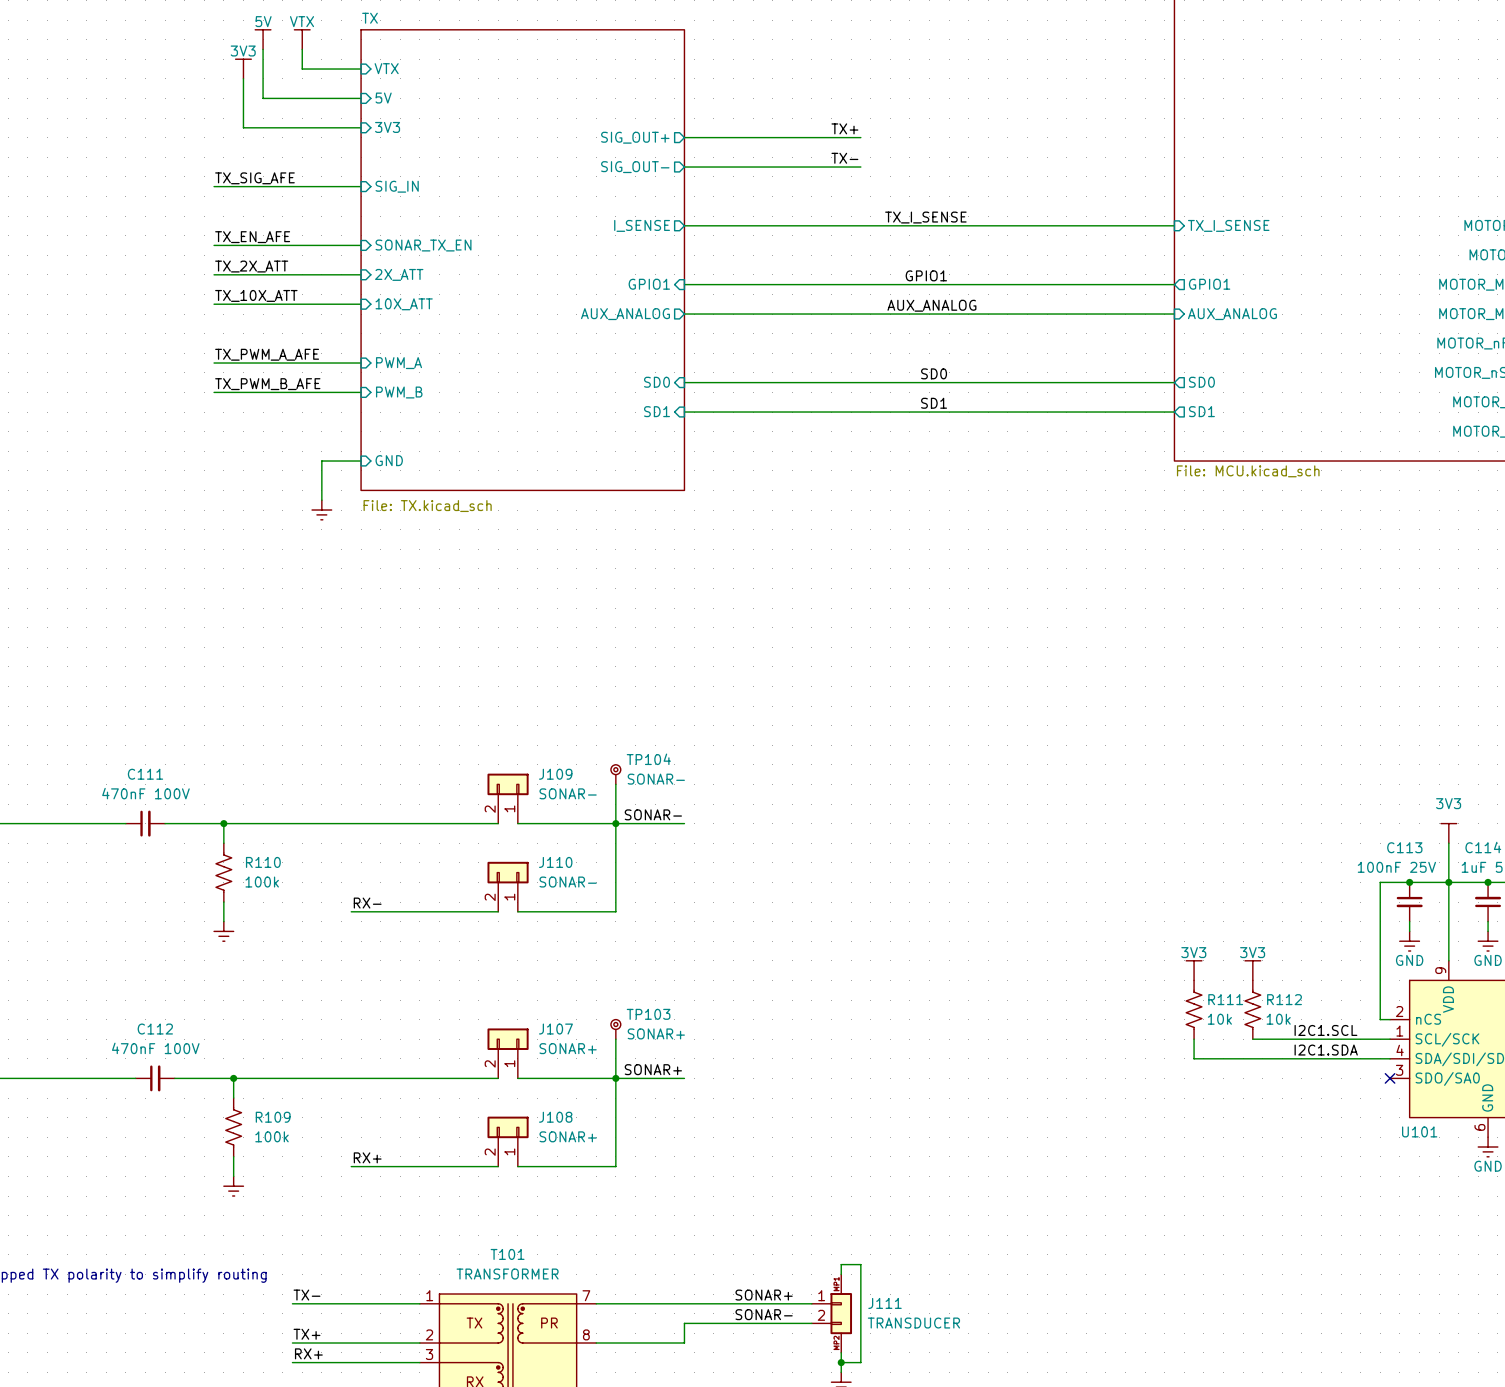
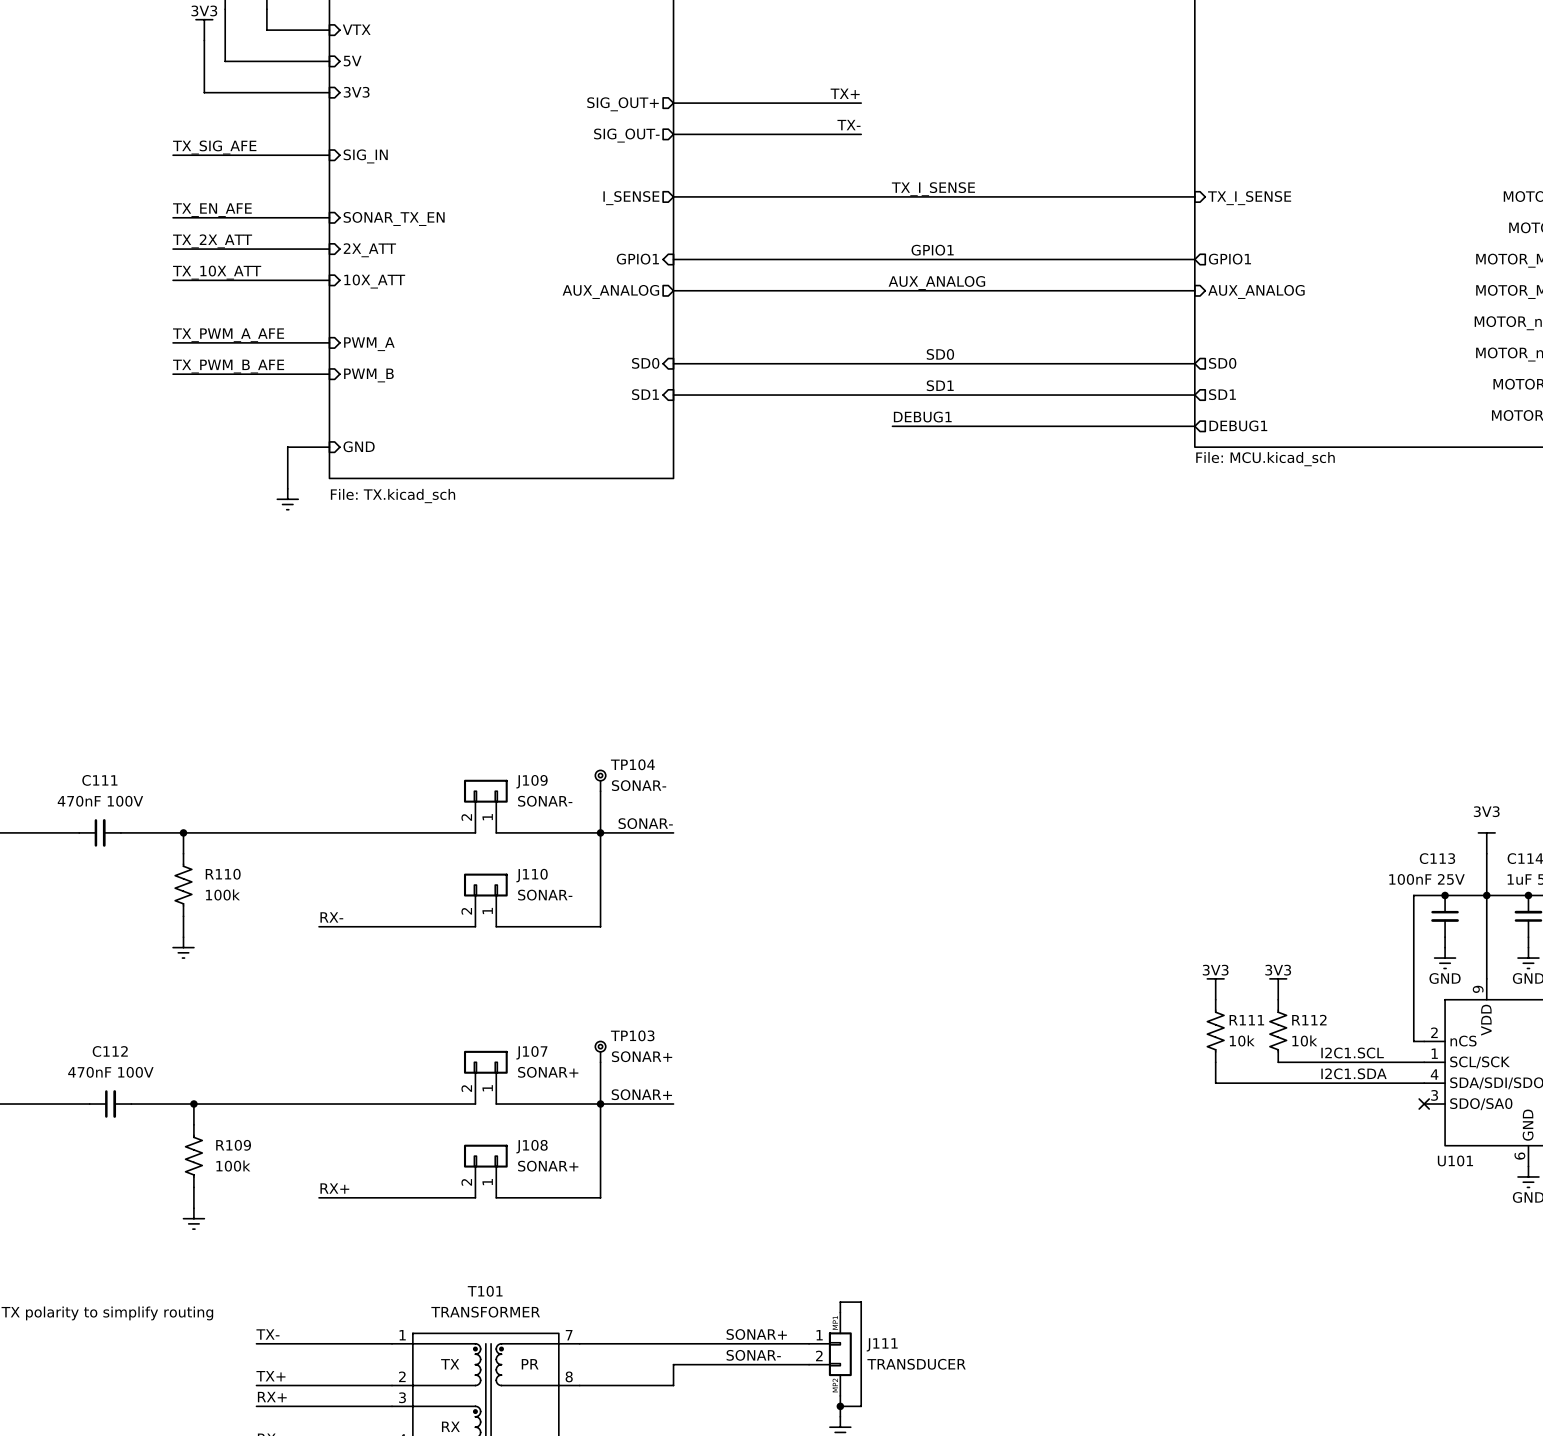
label: none -> DEBUG1 (922, 417)
wire: none -> (892, 426) (1194, 426)
sheet pin: none -> DEBUG1 (1238, 425)

